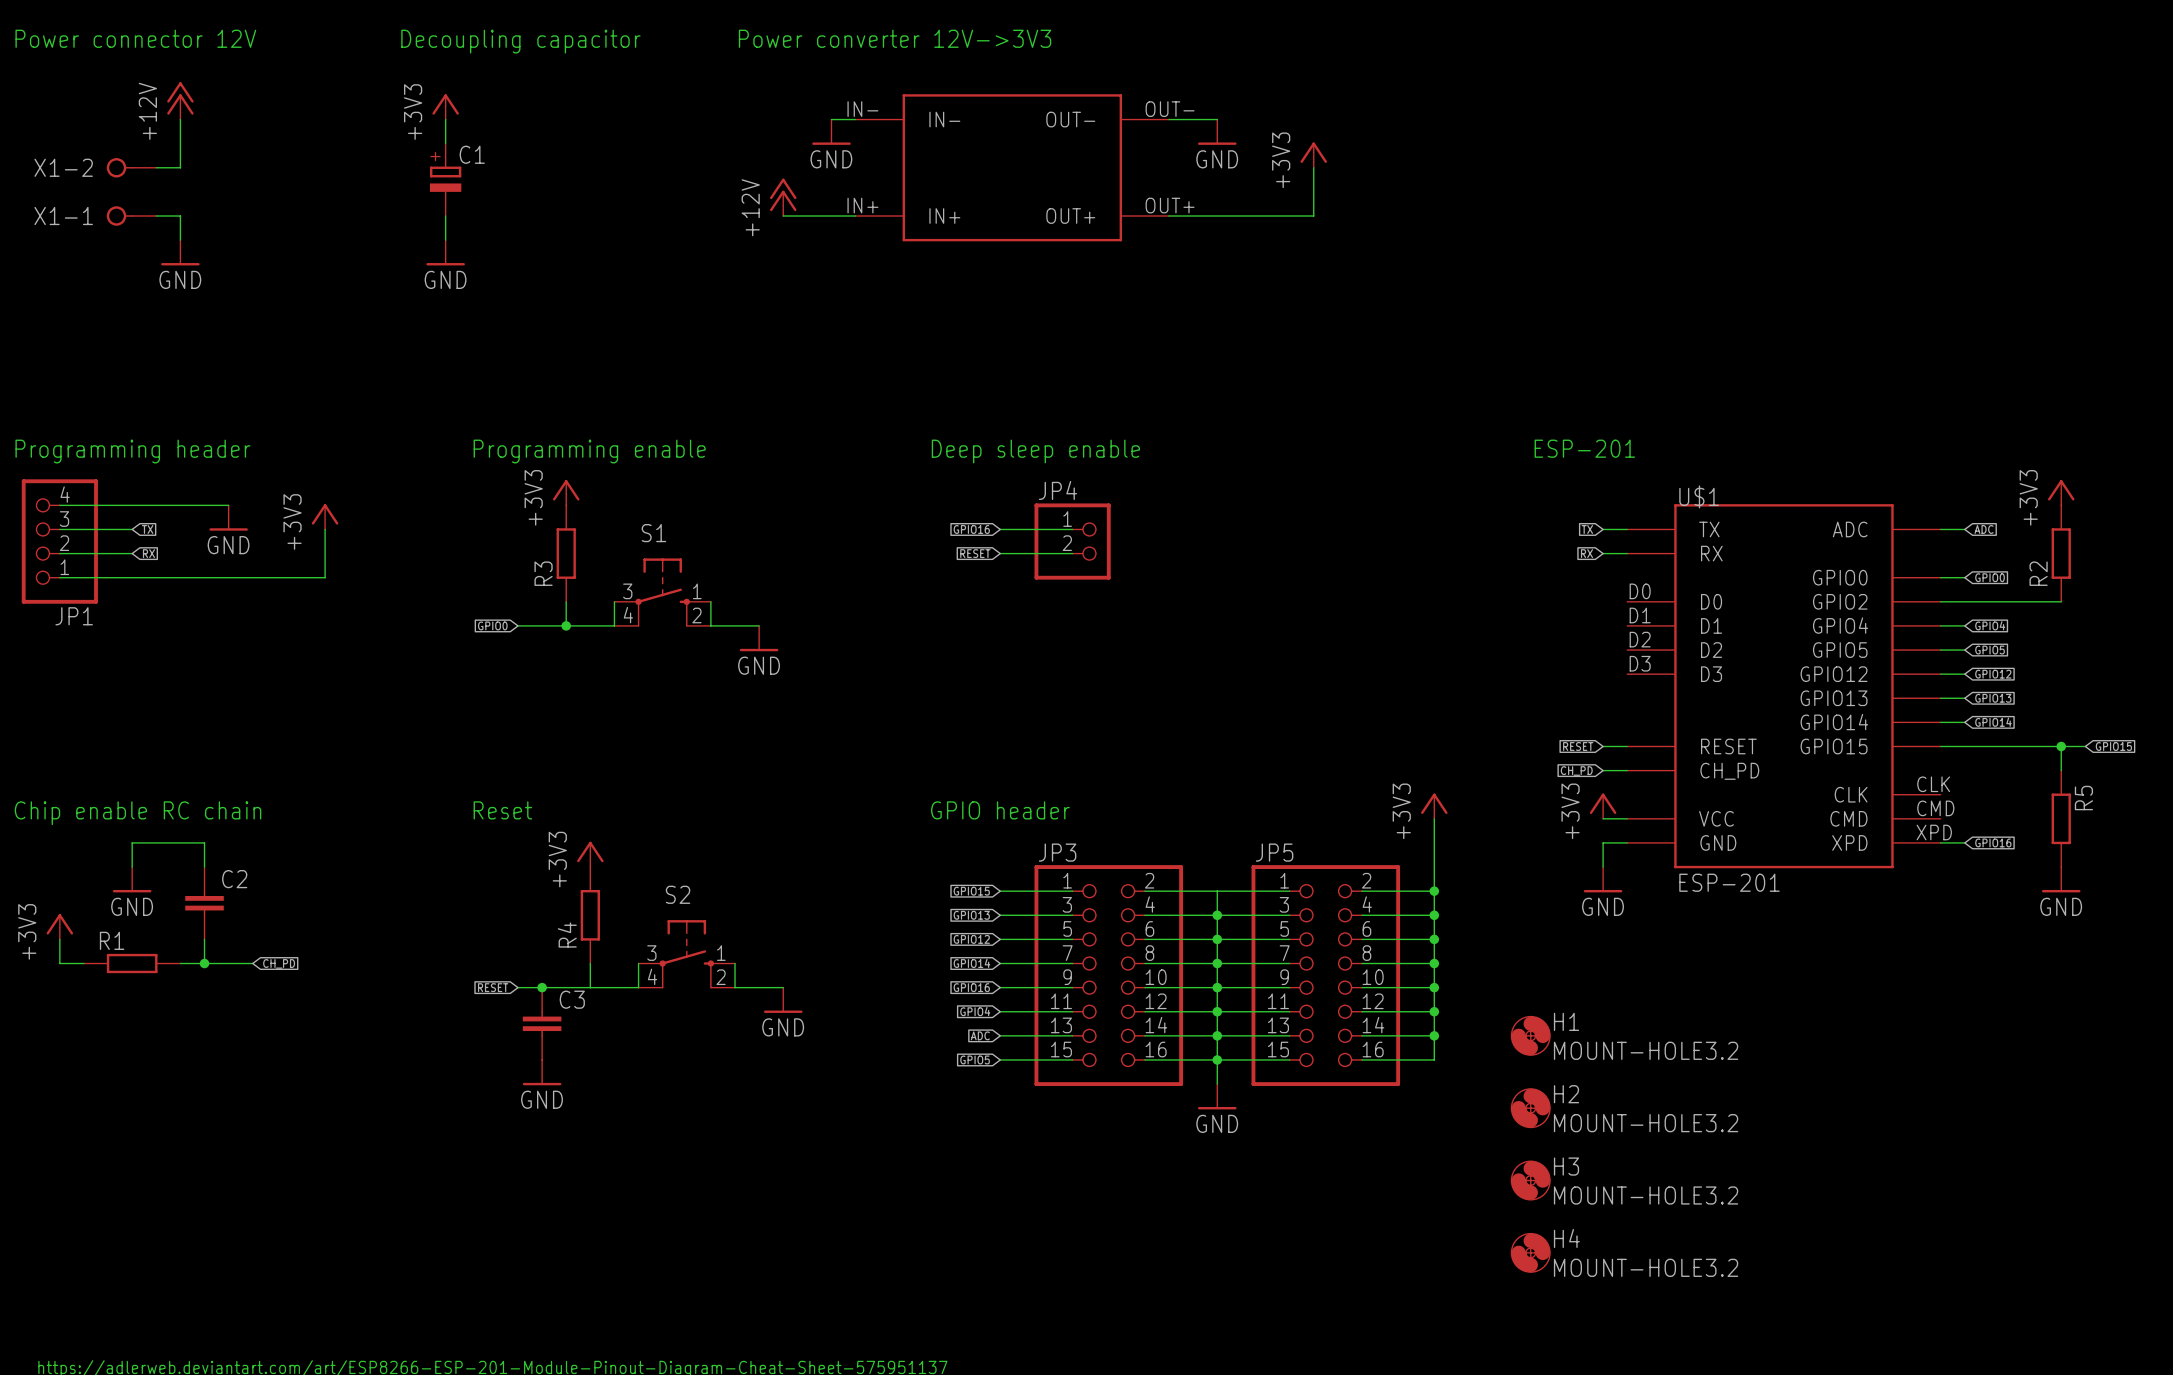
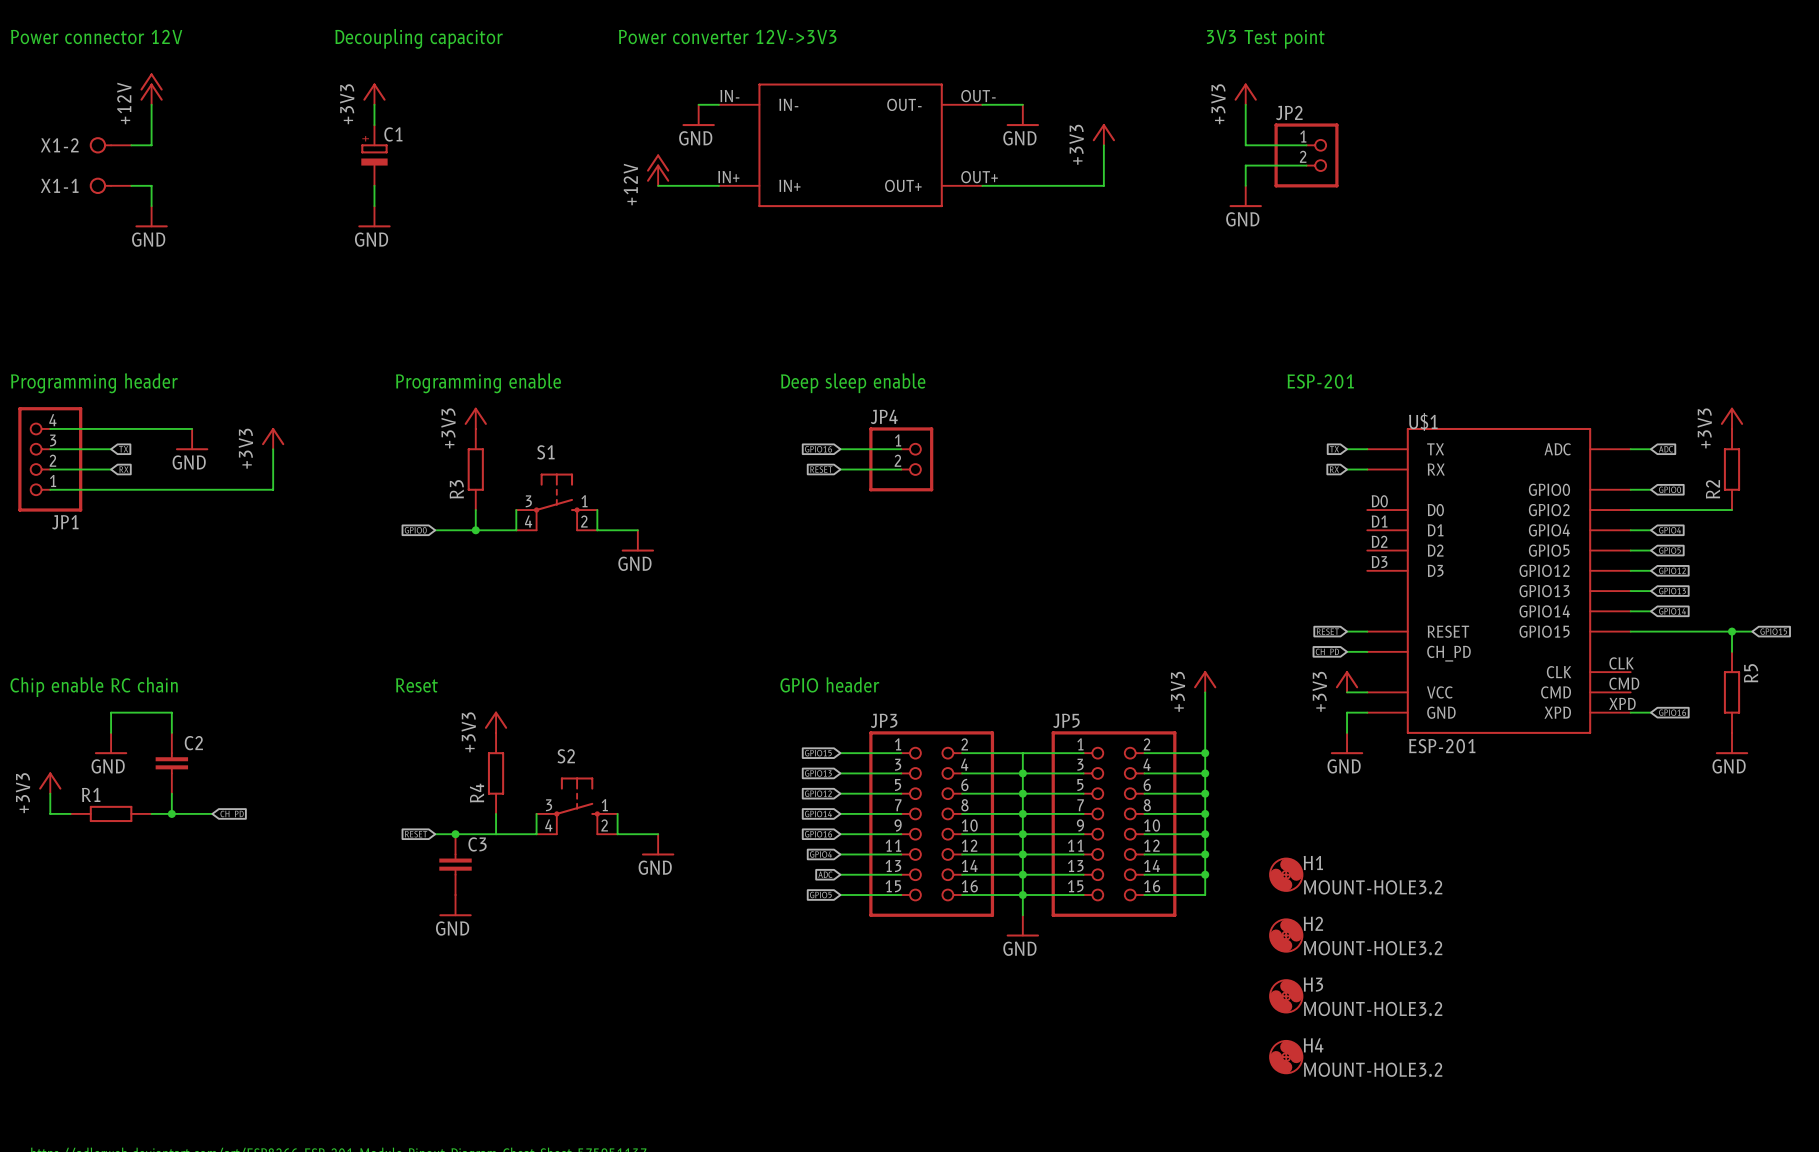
text: none -> 3V3 Test point (1265, 39)
power symbol: none -> +3V3 (1245, 94)
wire: none -> (1245, 104) (1245, 145) (1306, 145)
JP2: none -> (1306, 155)
wire: none -> (1306, 165) (1245, 165) (1245, 185)
power symbol: none -> GND (1245, 196)

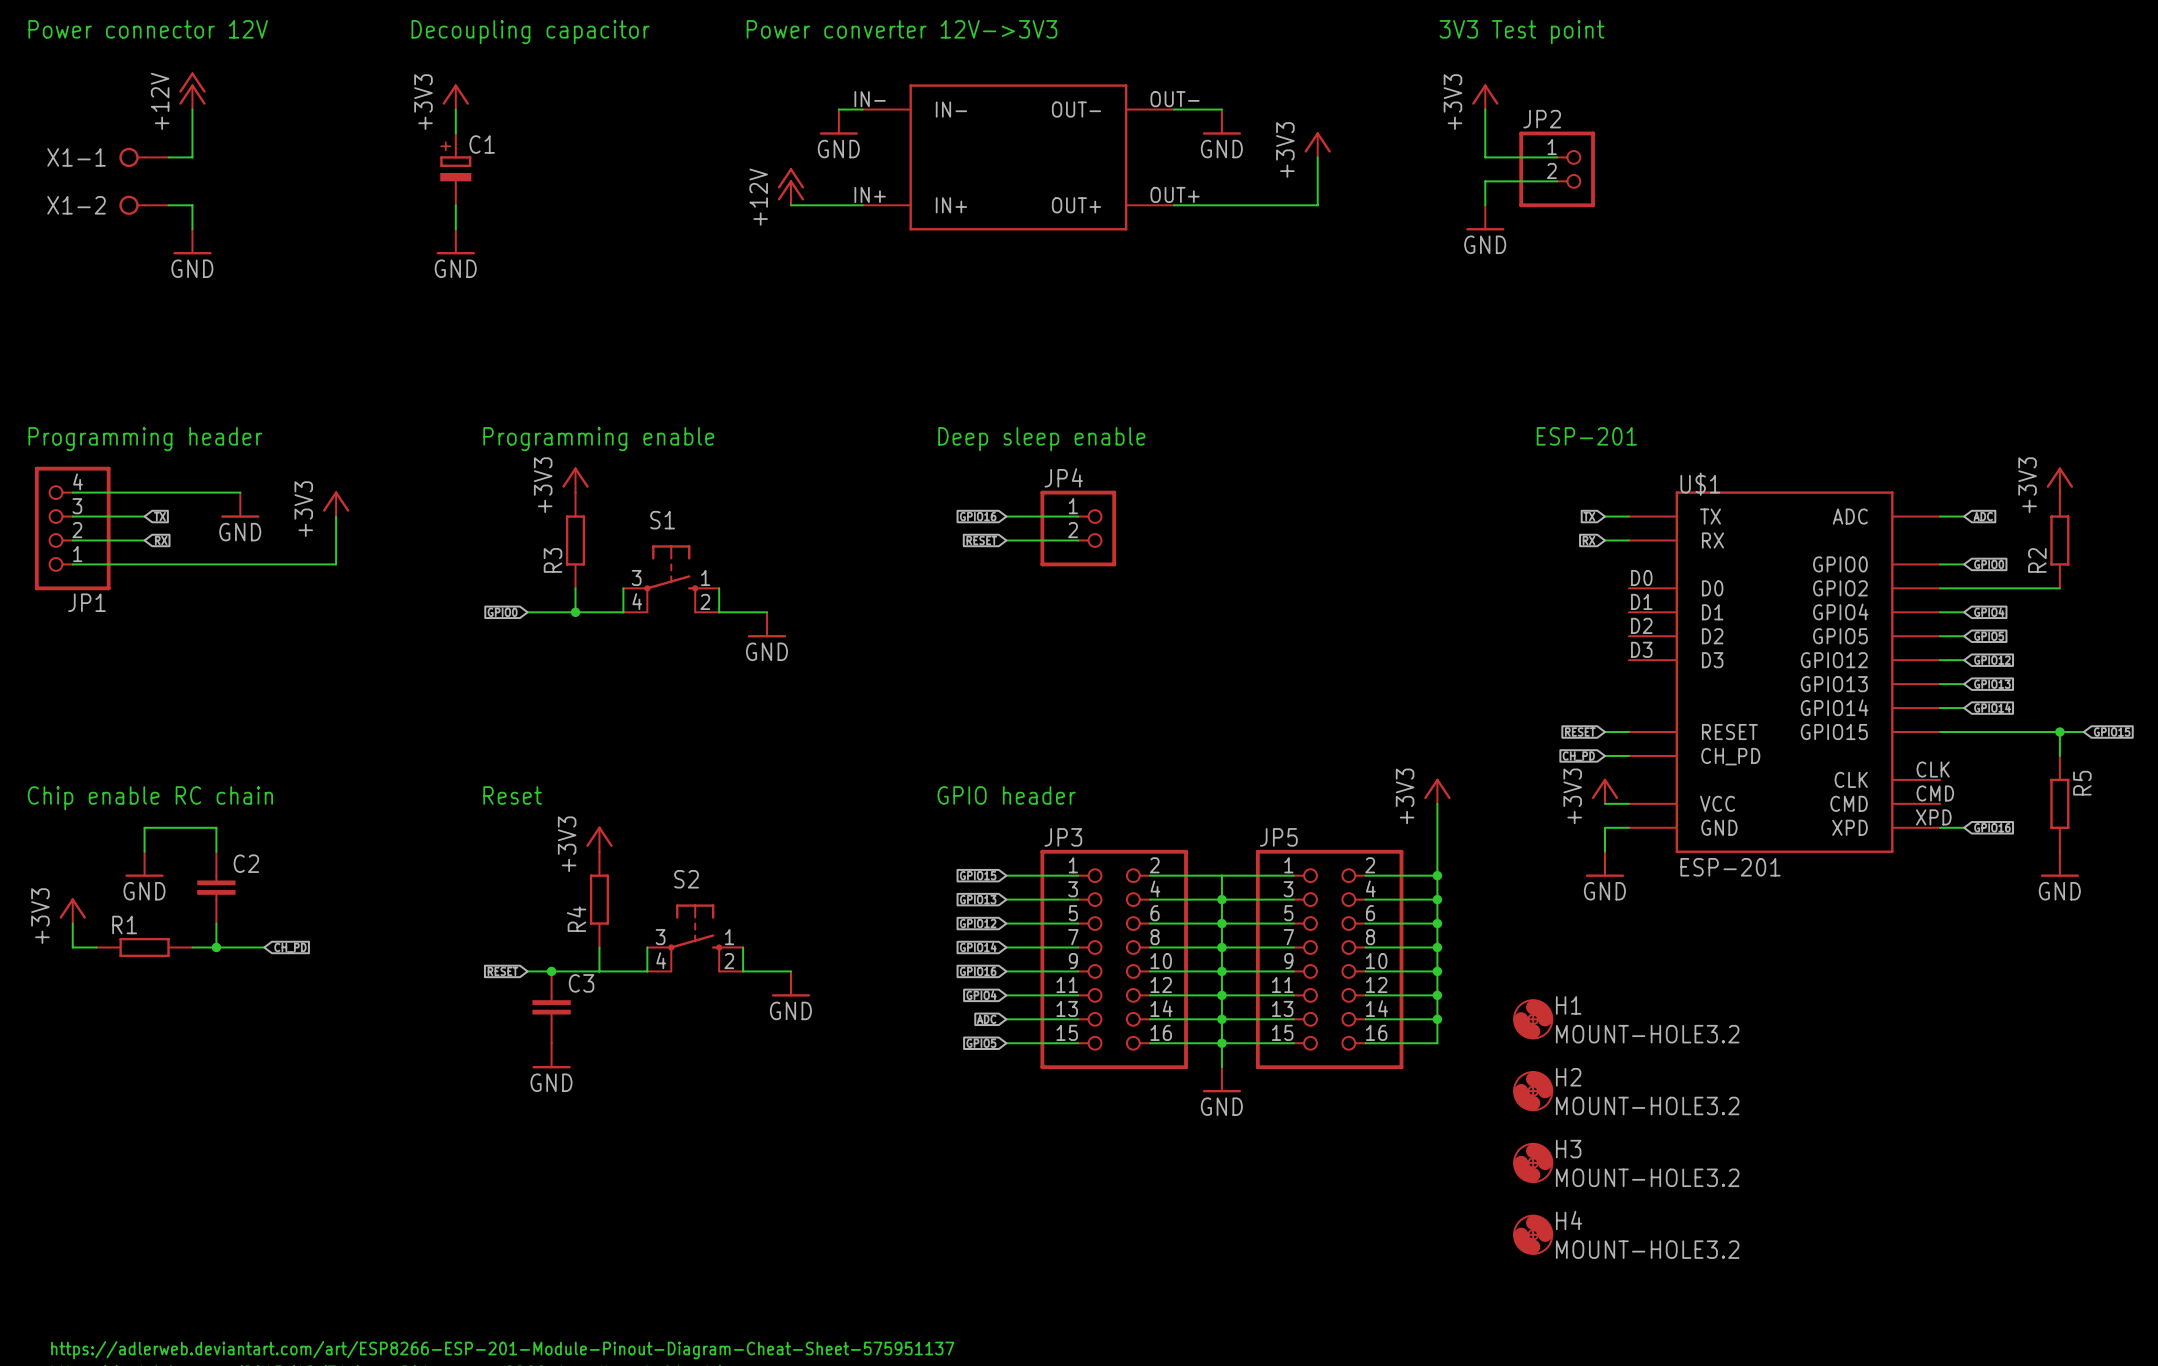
X1-2 name: X1-2 (59, 145) -> X1-1 (76, 157)
X1-1 name: X1-1 (59, 185) -> X1-2 (76, 205)

